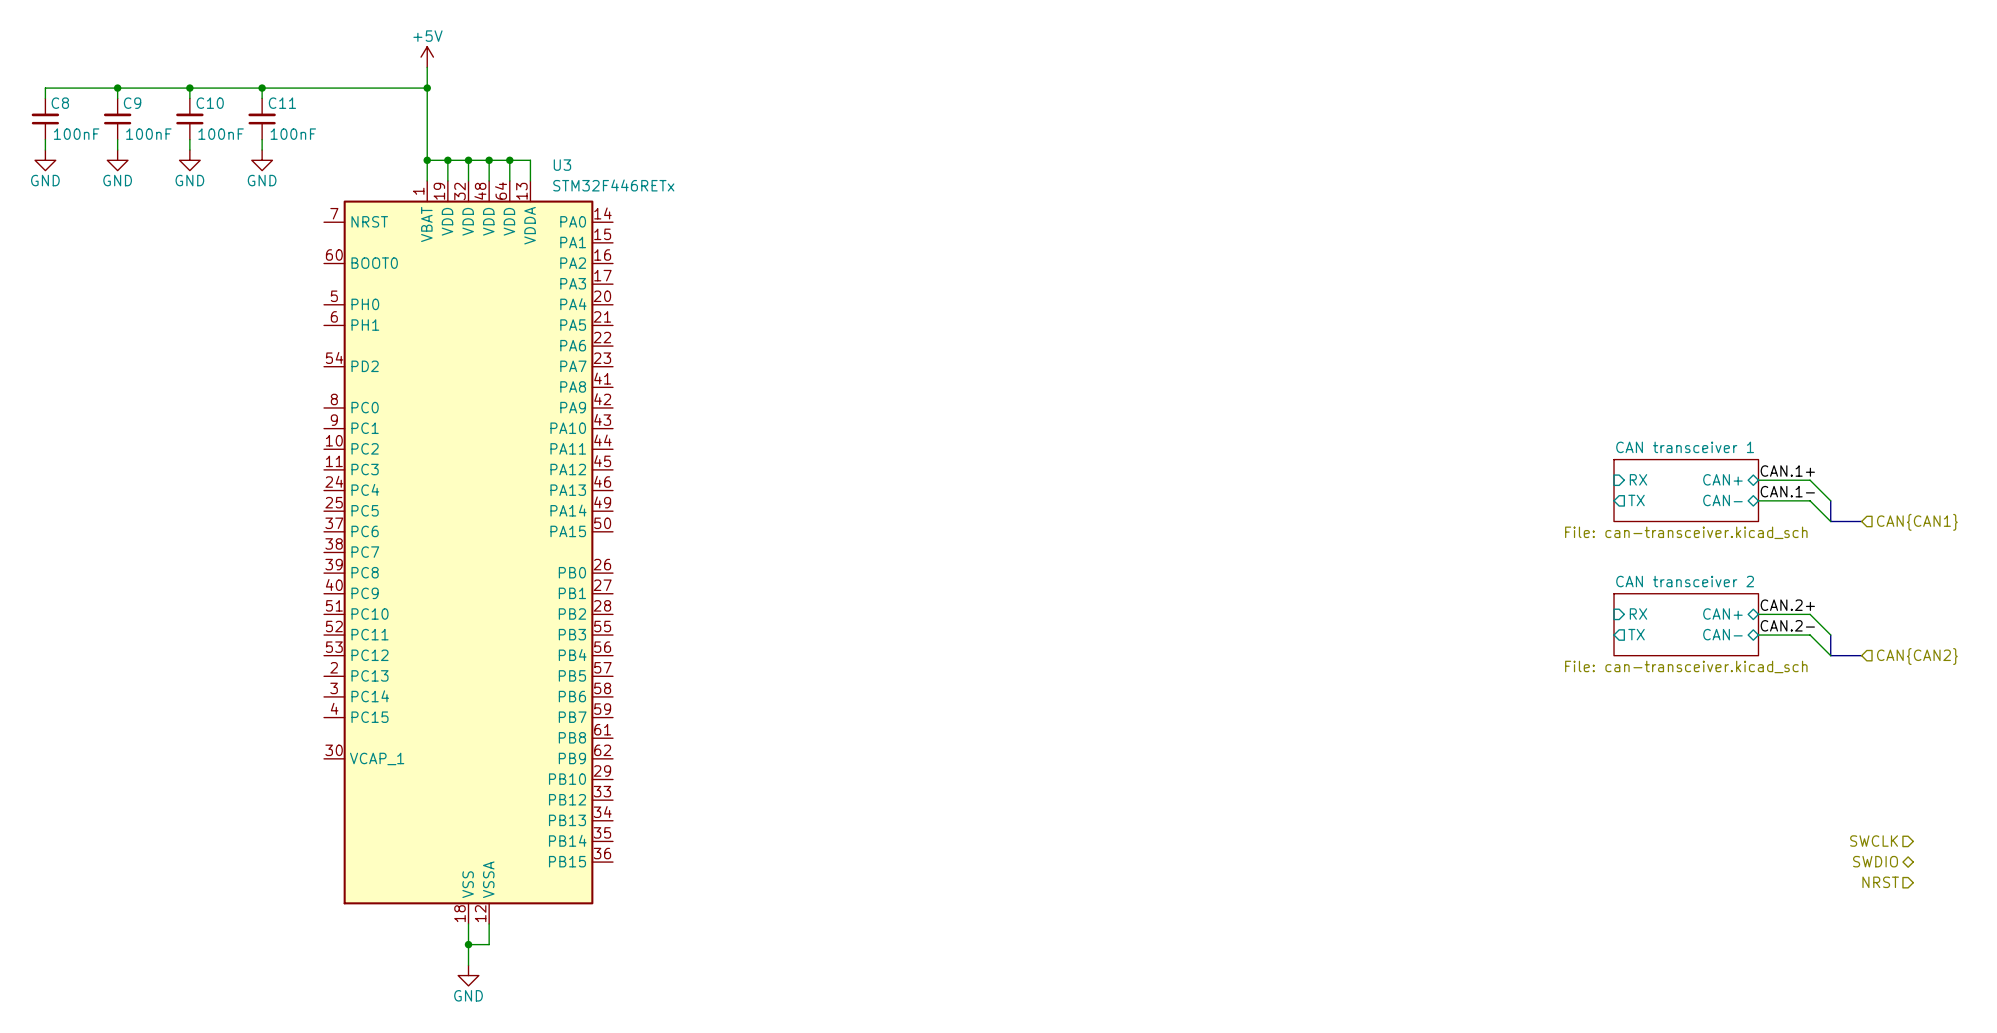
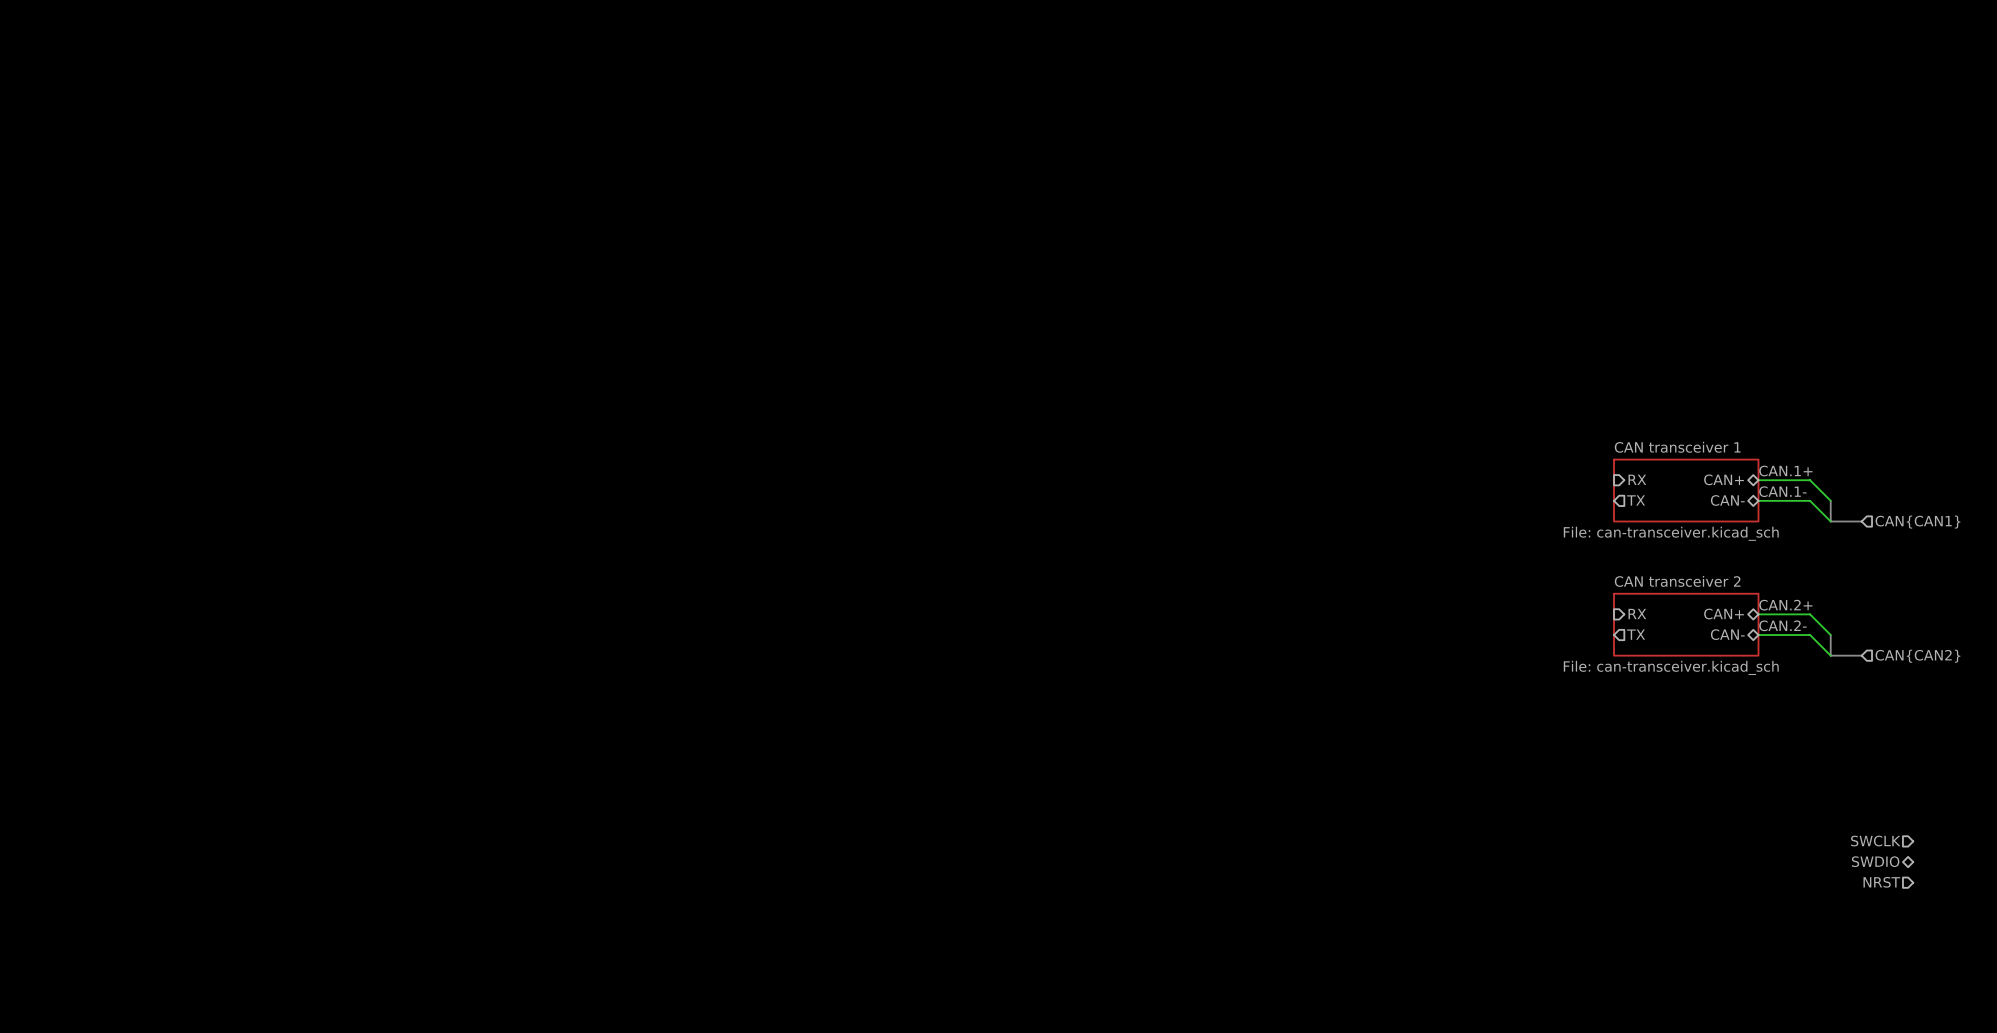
power symbol: +5V (427, 57) -> none
wire: (427, 67) (427, 180) -> none
wire: (117, 88) (117, 98) -> none
junction: (117, 88) -> none
wire: (189, 88) (189, 98) -> none
junction: (189, 88) -> none
wire: (262, 88) (262, 98) -> none
junction: (262, 88) -> none
wire: (427, 88) (45, 88) (45, 98) -> none
junction: (427, 88) -> none
C8: 100nF (45, 119) -> none
C9: 100nF (117, 119) -> none
C10: 100nF (189, 119) -> none
C11: 100nF (262, 119) -> none
wire: (45, 139) (45, 149) -> none
wire: (117, 139) (117, 149) -> none
wire: (189, 139) (189, 149) -> none
wire: (262, 139) (262, 149) -> none
power symbol: GND (45, 160) -> none
power symbol: GND (117, 160) -> none
power symbol: GND (189, 160) -> none
power symbol: GND (262, 160) -> none
wire: (427, 160) (530, 160) (530, 180) -> none
junction: (427, 160) -> none
wire: (447, 160) (447, 180) -> none
junction: (447, 160) -> none
wire: (468, 160) (468, 180) -> none
junction: (468, 160) -> none
wire: (489, 160) (489, 180) -> none
junction: (489, 160) -> none
wire: (509, 160) (509, 180) -> none
junction: (509, 160) -> none
U3: STM32F446RETx (468, 552) -> none
wire: (468, 923) (468, 965) -> none
wire: (489, 923) (489, 944) (468, 944) -> none
junction: (468, 944) -> none
power symbol: GND (468, 975) -> none

